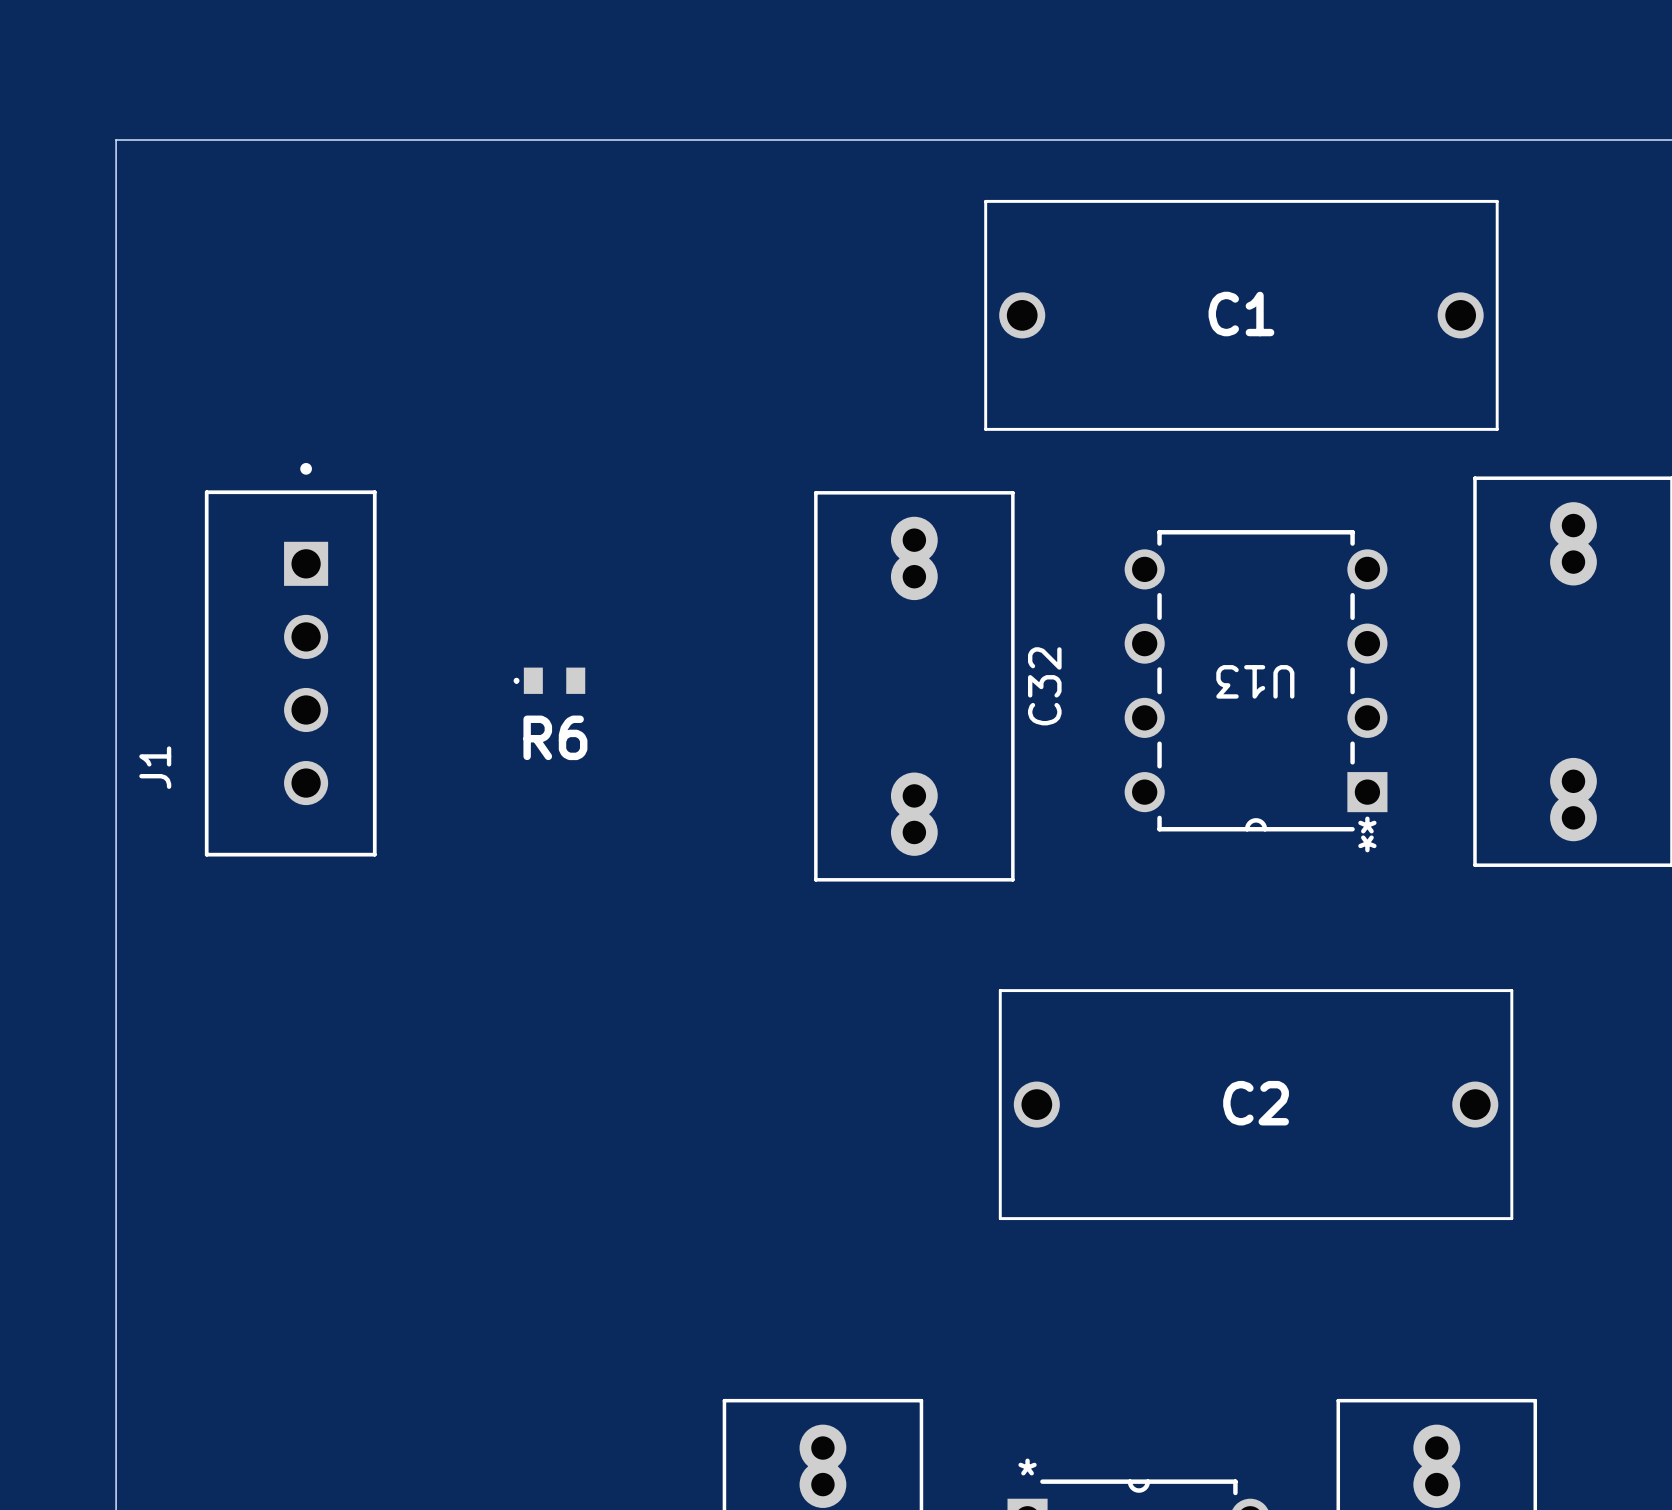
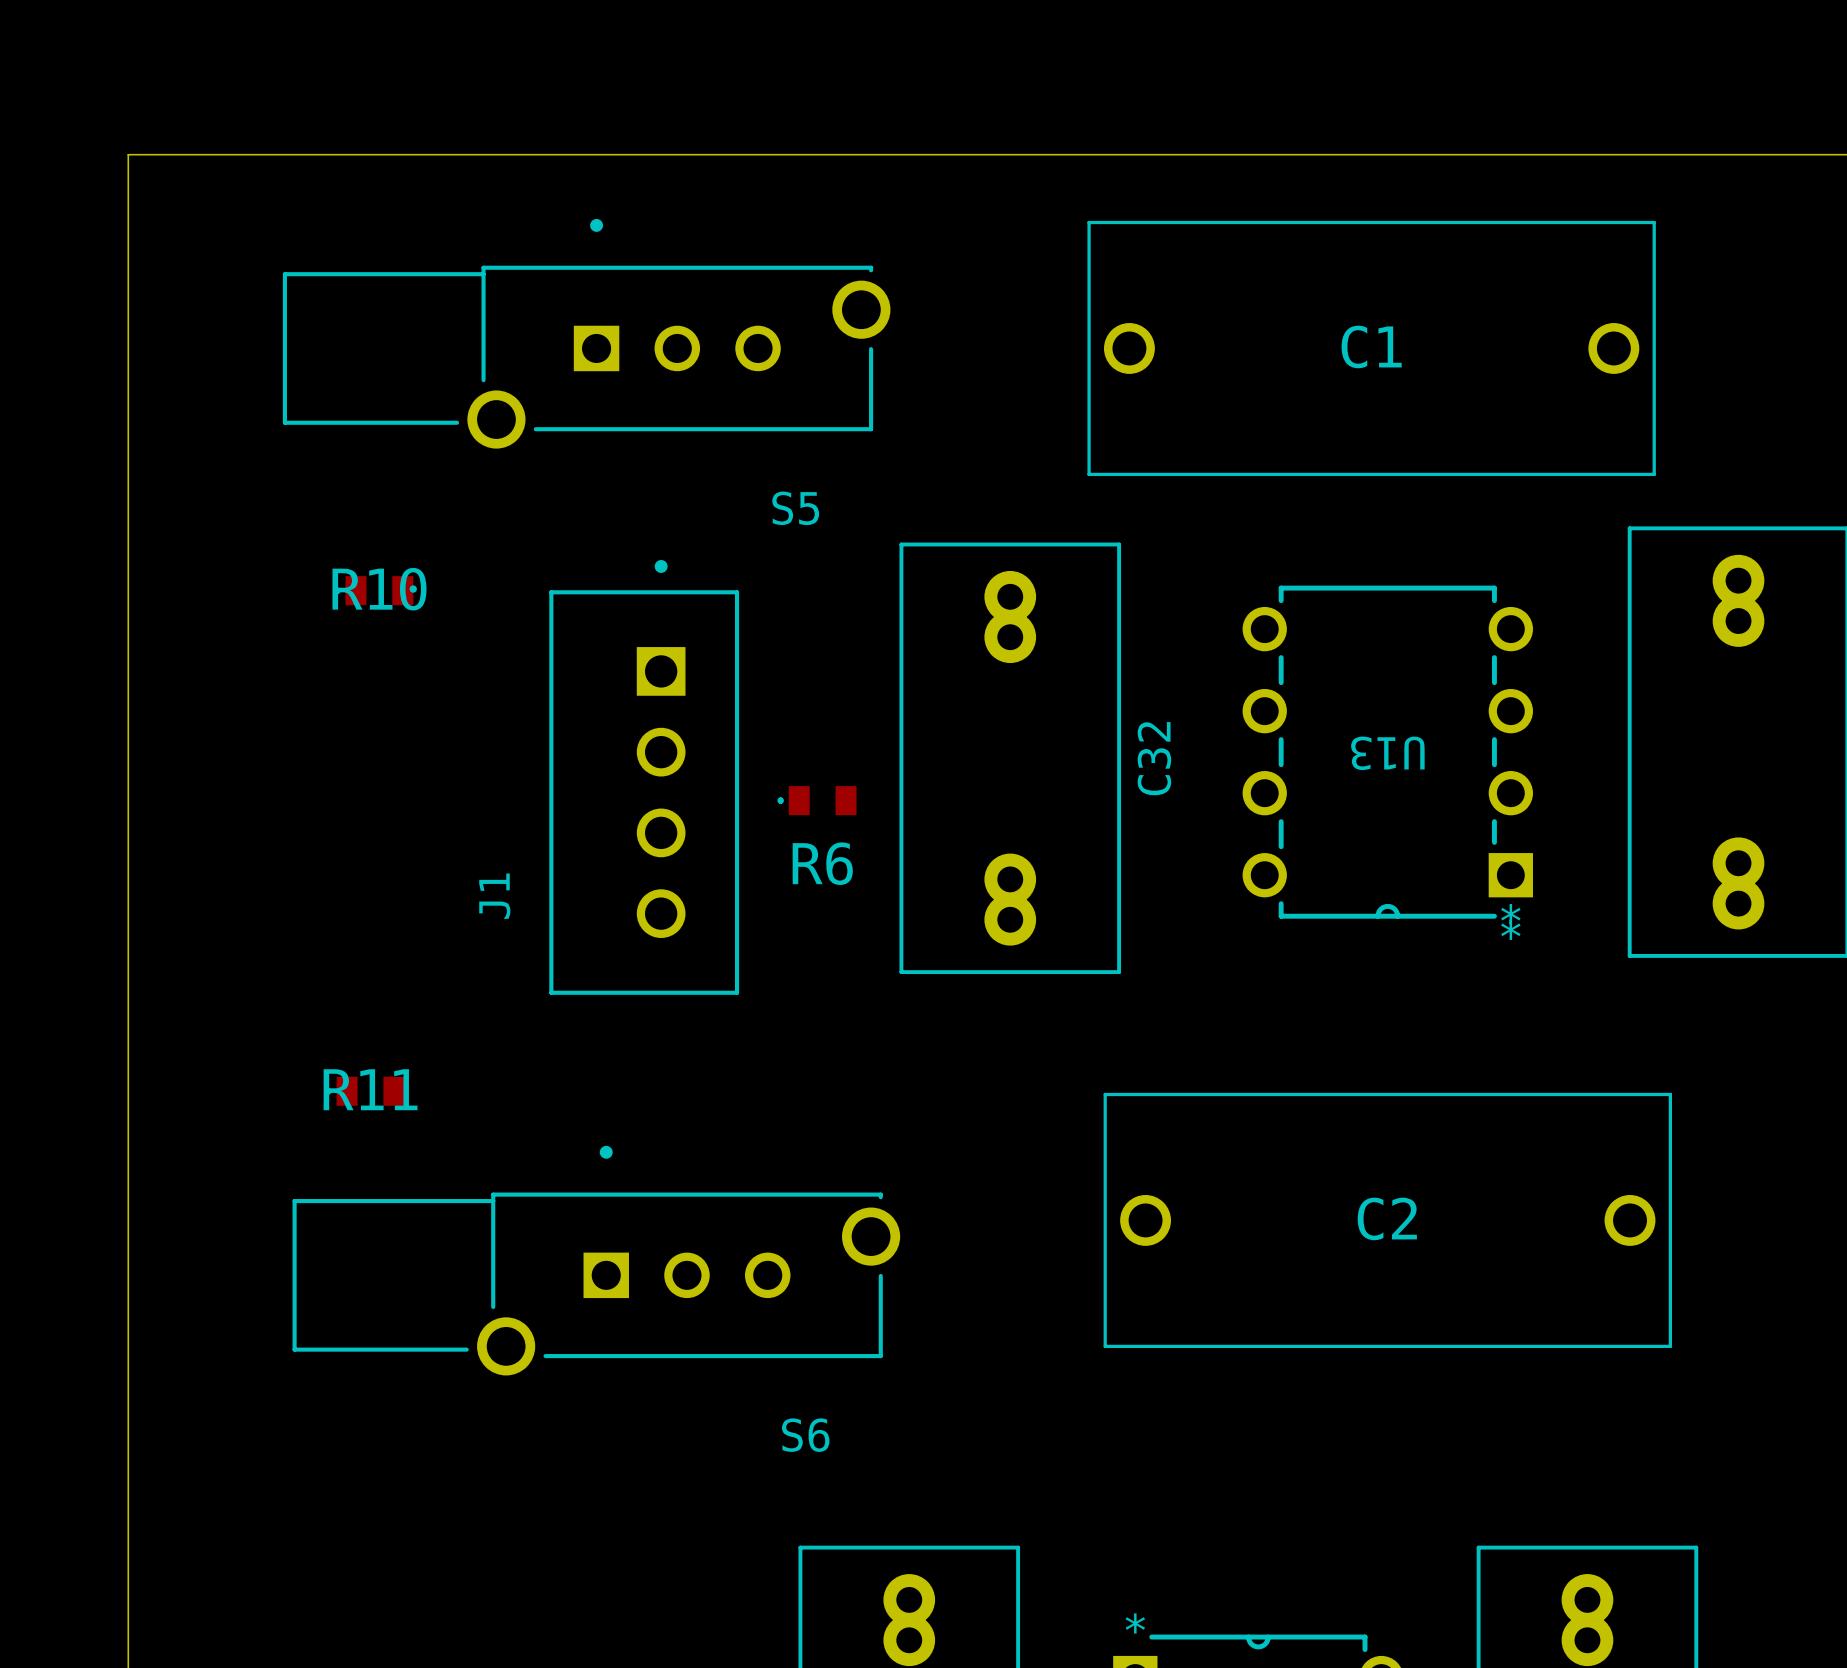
S5: none -> (586, 333)
R10: none -> (373, 590)
J1 position: (290, 659) -> (644, 777)
R6 position: (549, 680) -> (816, 800)
R11: none -> (364, 1091)
S6: none -> (596, 1260)

